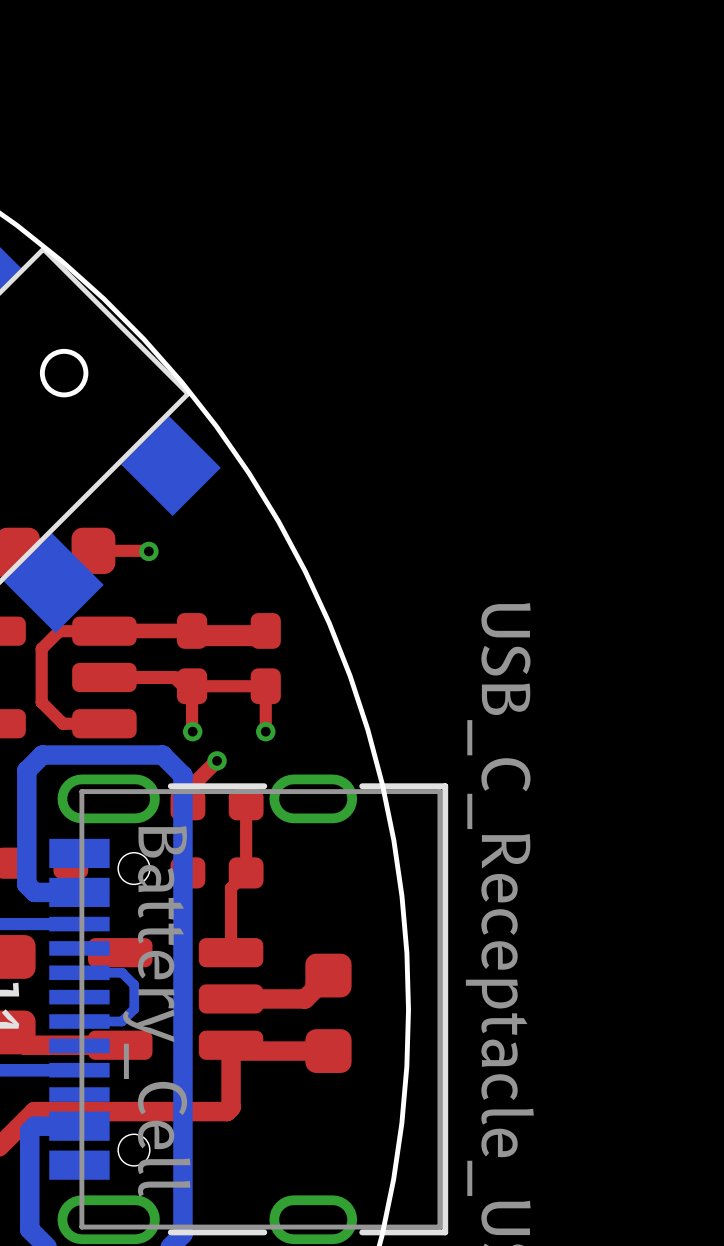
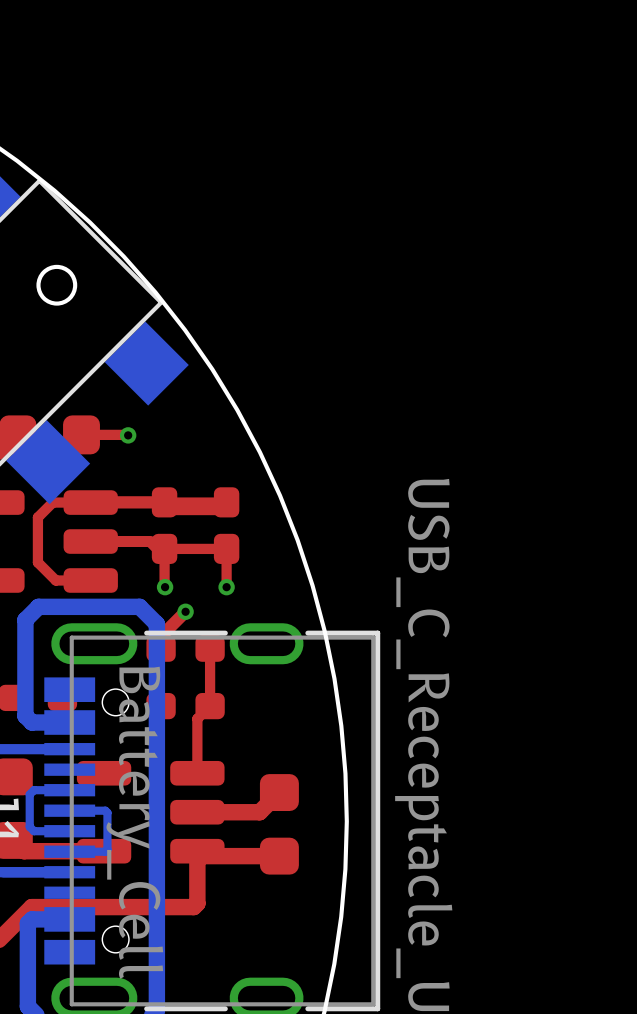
bottom track: (79, 972) (122, 972) (134, 984) (134, 1009) (121, 1021) (79, 1021) -> (69, 790) (34, 790) (29, 794) (29, 826) (34, 831) (69, 831)
bottom track: none -> (69, 810) (105, 810) (107, 812) (107, 849) (105, 851) (69, 851)

